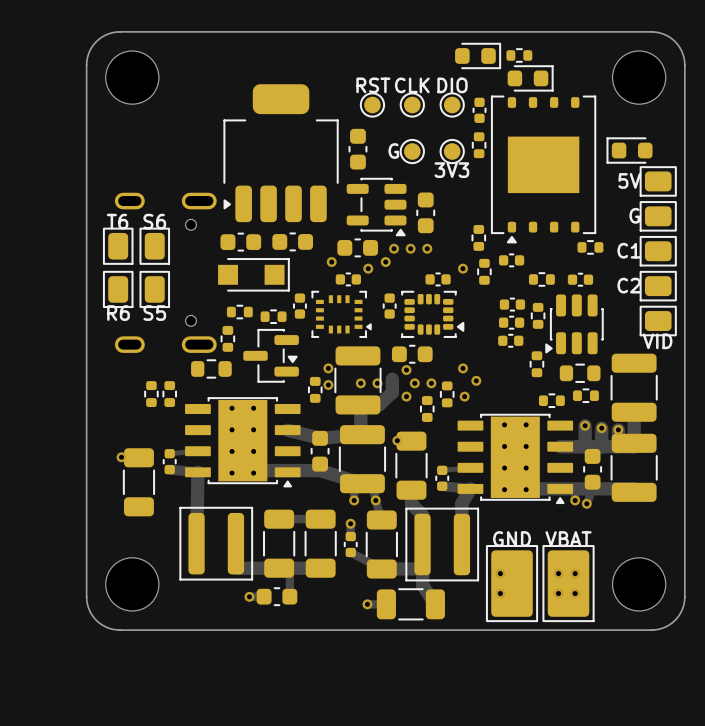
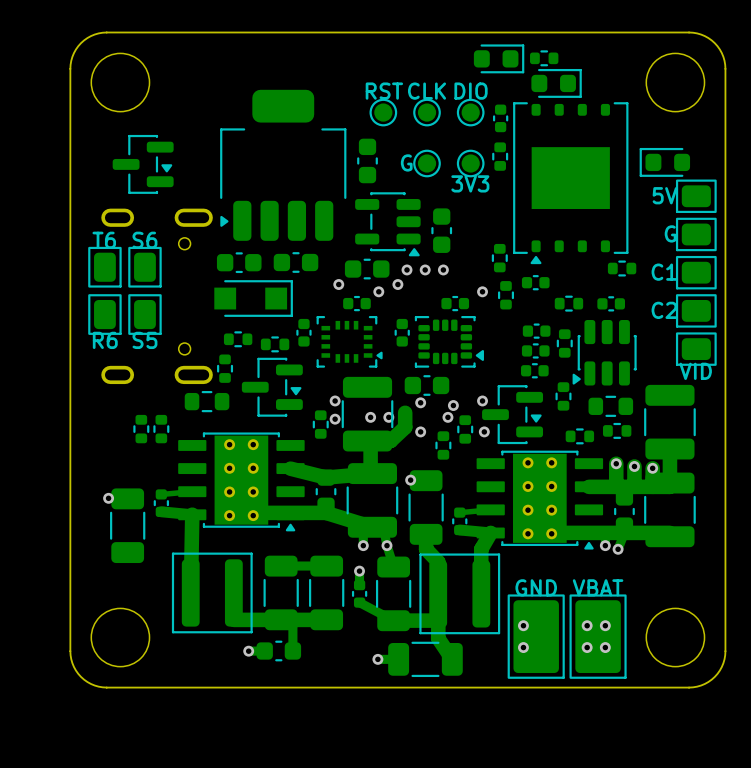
part: none -> (143, 164)
via: none -> (453, 405)
via: (476, 380) -> none
part: none -> (512, 414)
via: (414, 383) -> none

